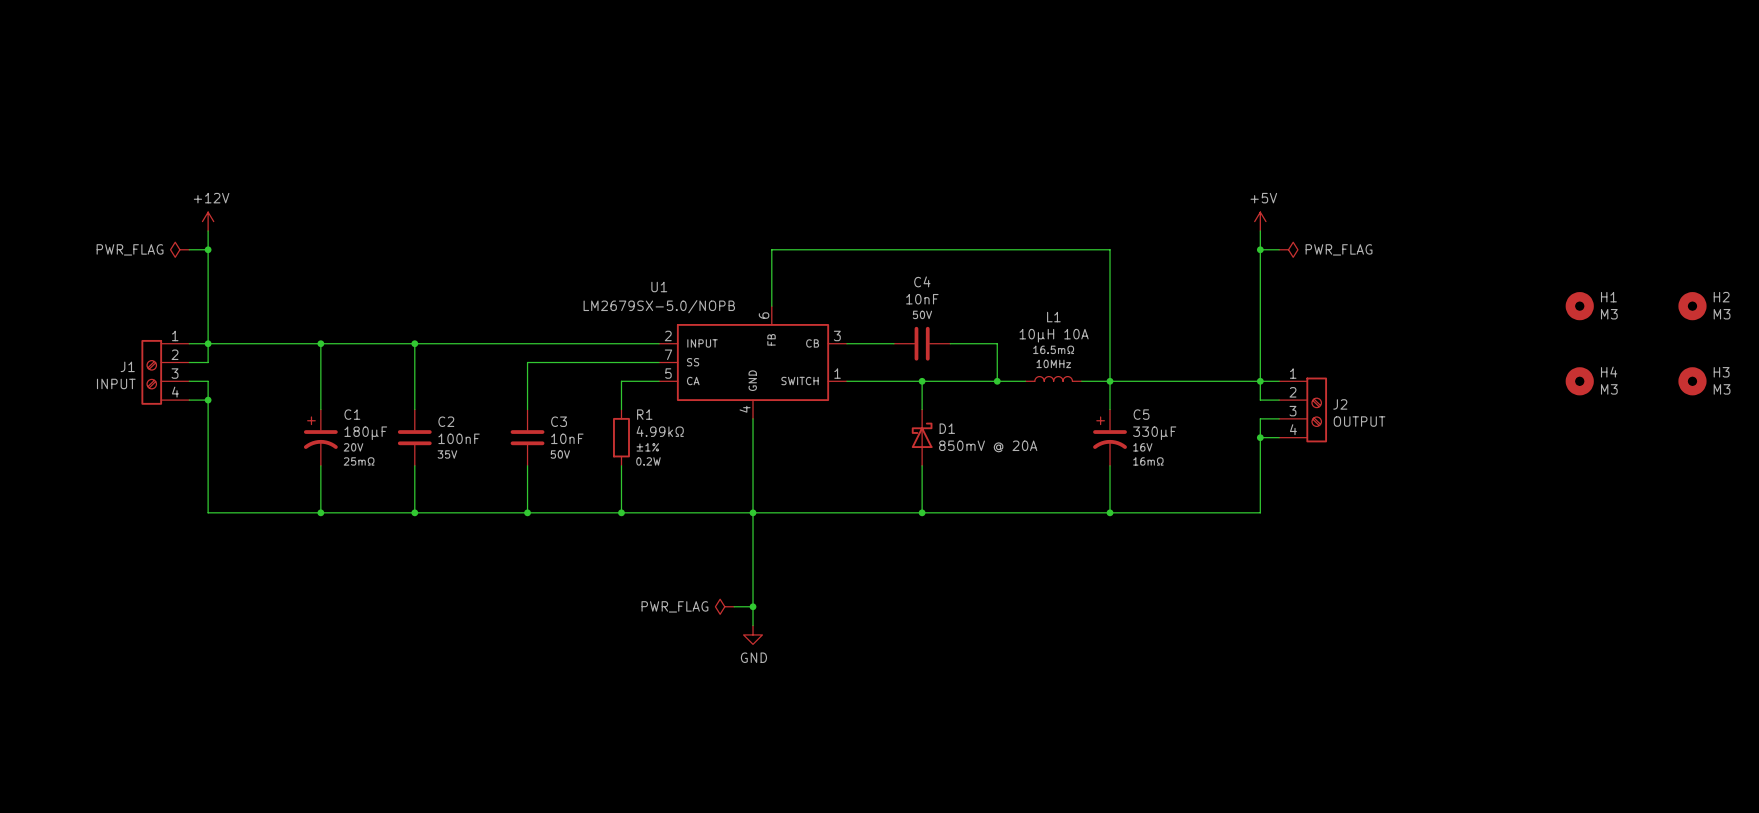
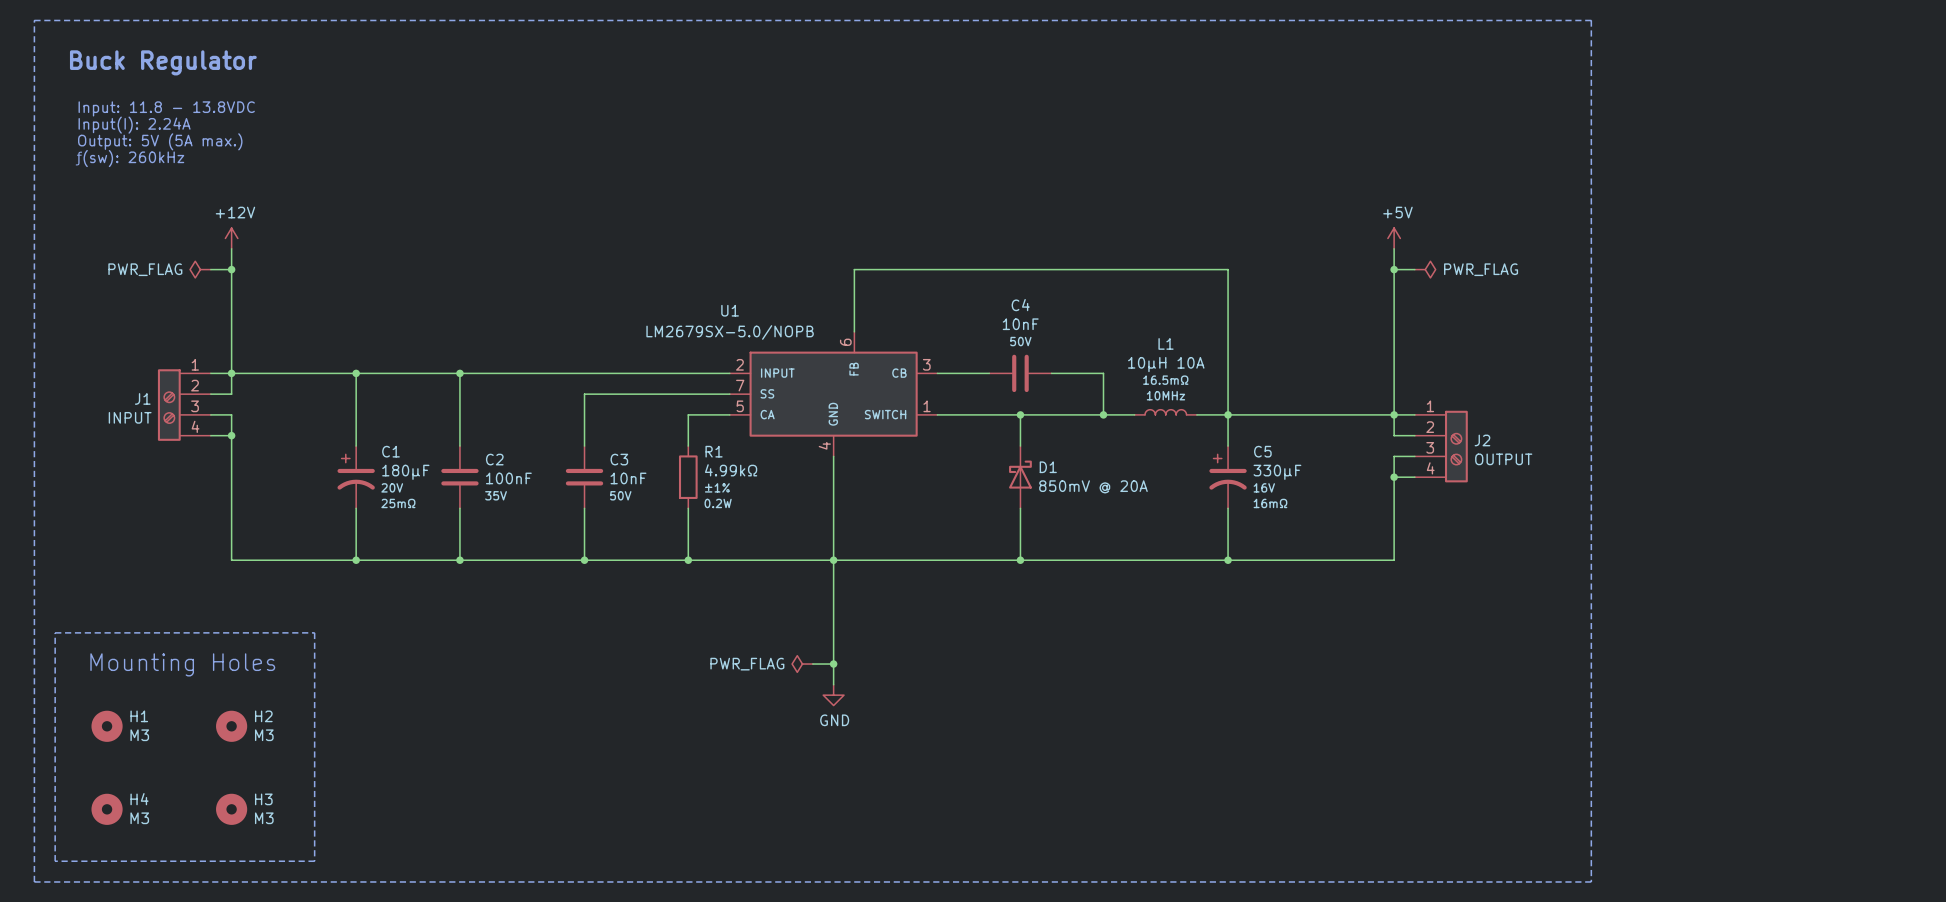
line: none -> (34, 20) (1591, 20) (1591, 881) (34, 881) (34, 20)
text: none -> Buck Regulator (163, 62)
text: none -> Input: 11.8 - 13.8VDC (166, 108)
text: none -> Input(I): 2.24A (134, 125)
text: none -> Output: 5V (5A max.) (160, 141)
text: none -> ƒ(sw): 260kHz (129, 158)
H1 position: (1579, 306) -> (107, 726)
H2 position: (1692, 306) -> (231, 726)
H4 position: (1579, 381) -> (107, 809)
H3 position: (1692, 381) -> (231, 809)
line: none -> (55, 632) (314, 632) (314, 861) (55, 861) (55, 632)
text: none -> Mounting Holes (182, 664)

